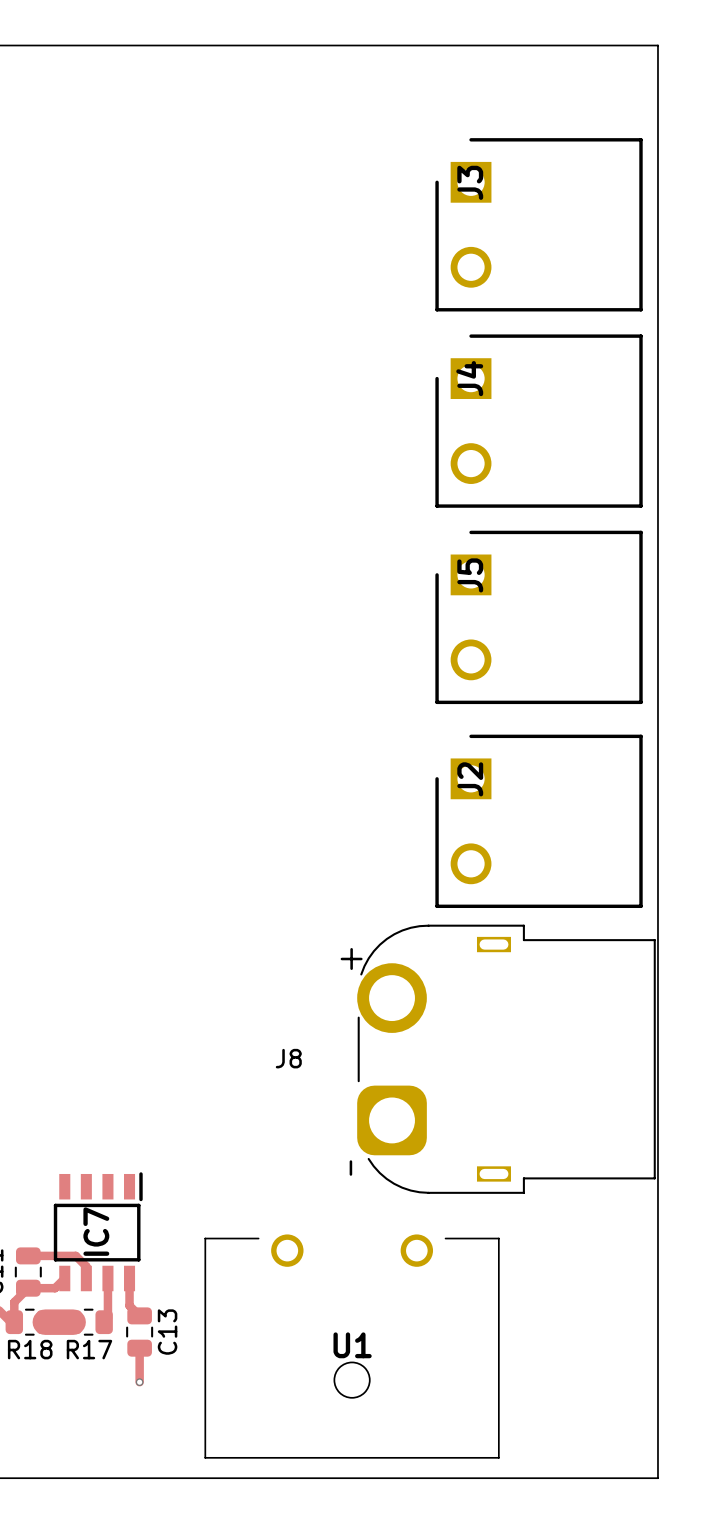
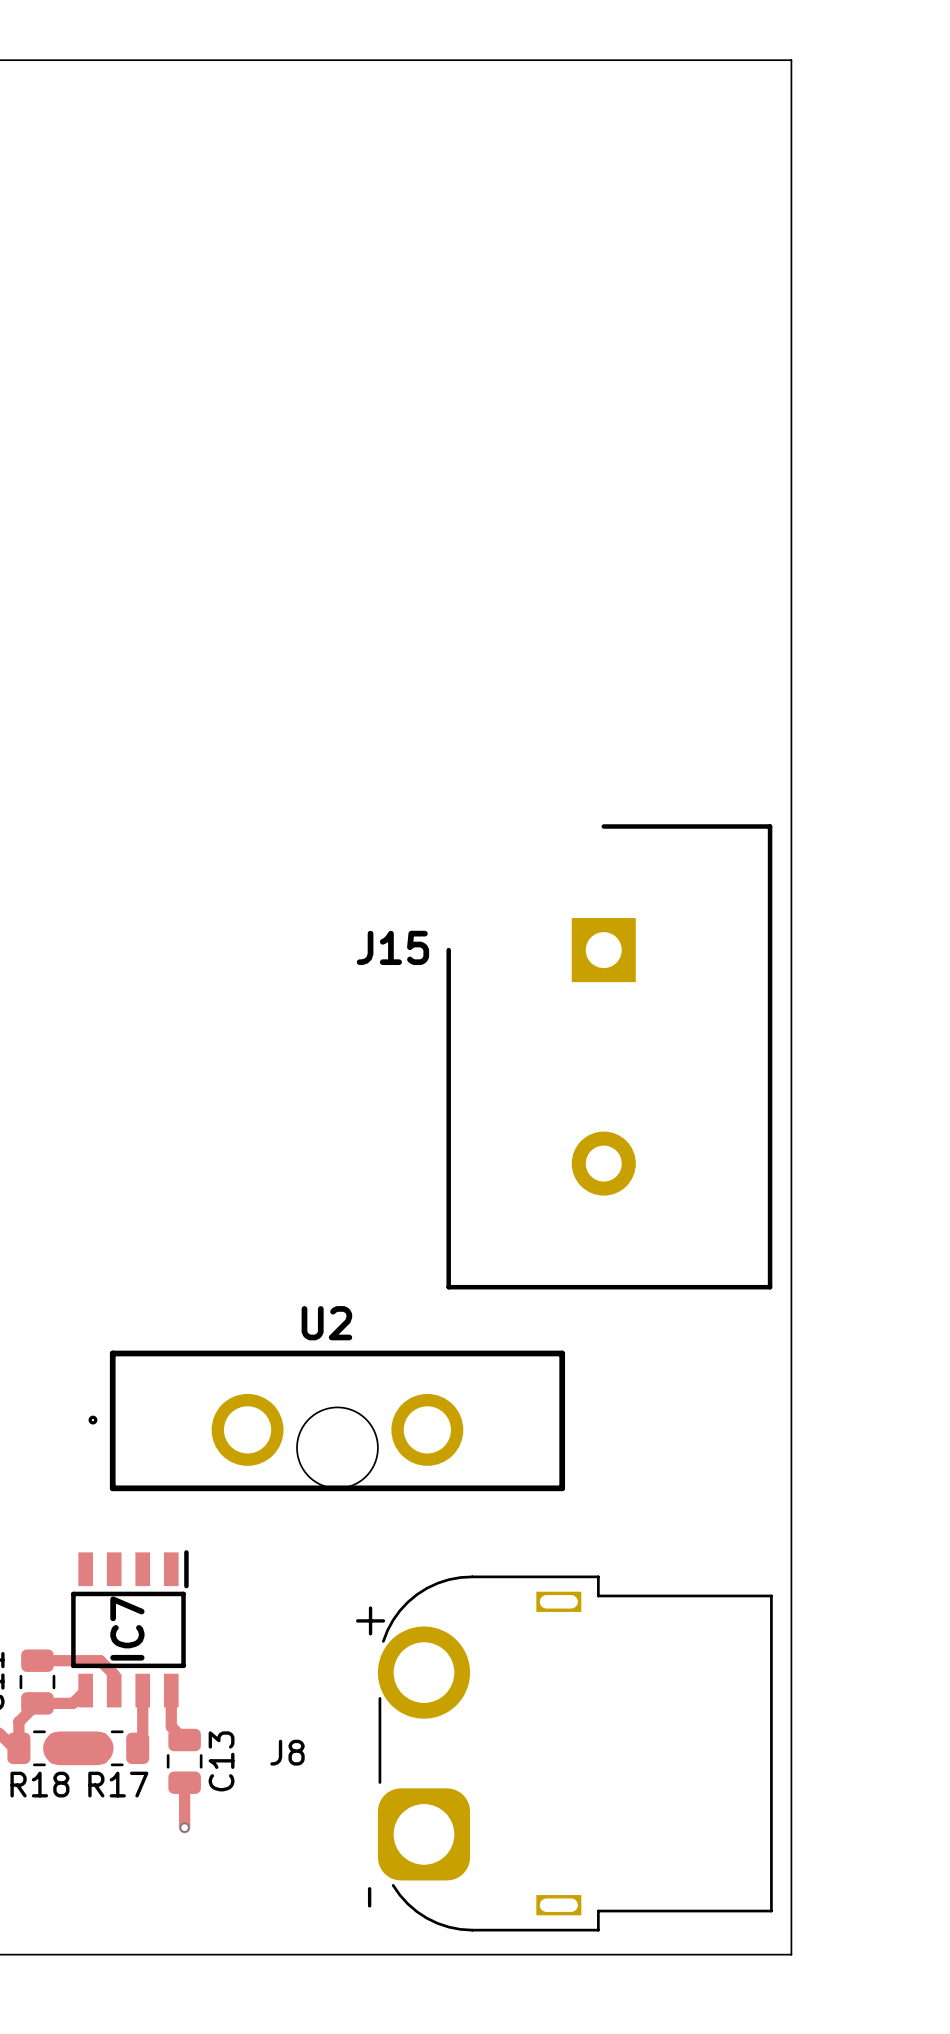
board edge: (598, 45) (657, 45) (657, 1478) (598, 1478) -> (791, 60) (791, 1954)
J3: (539, 224) -> none
J4: (539, 421) -> none
J5: (539, 617) -> none
J15: none -> (609, 1056)
J2: (539, 821) -> none
J8 position: (506, 1059) -> (575, 1753)
U2: none -> (326, 1420)
U1: (352, 1346) -> none

